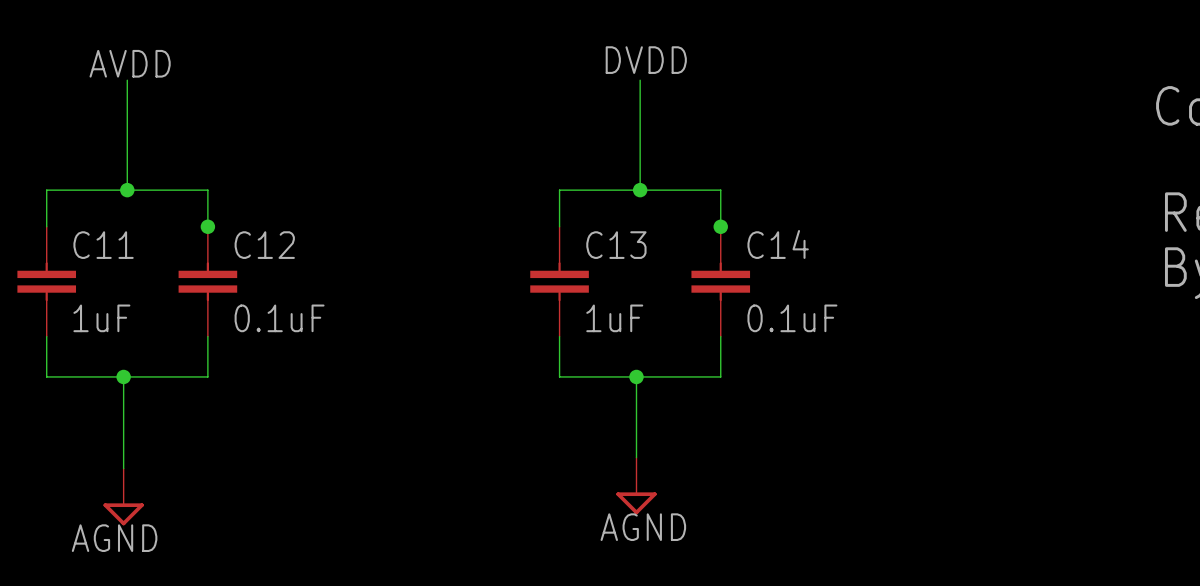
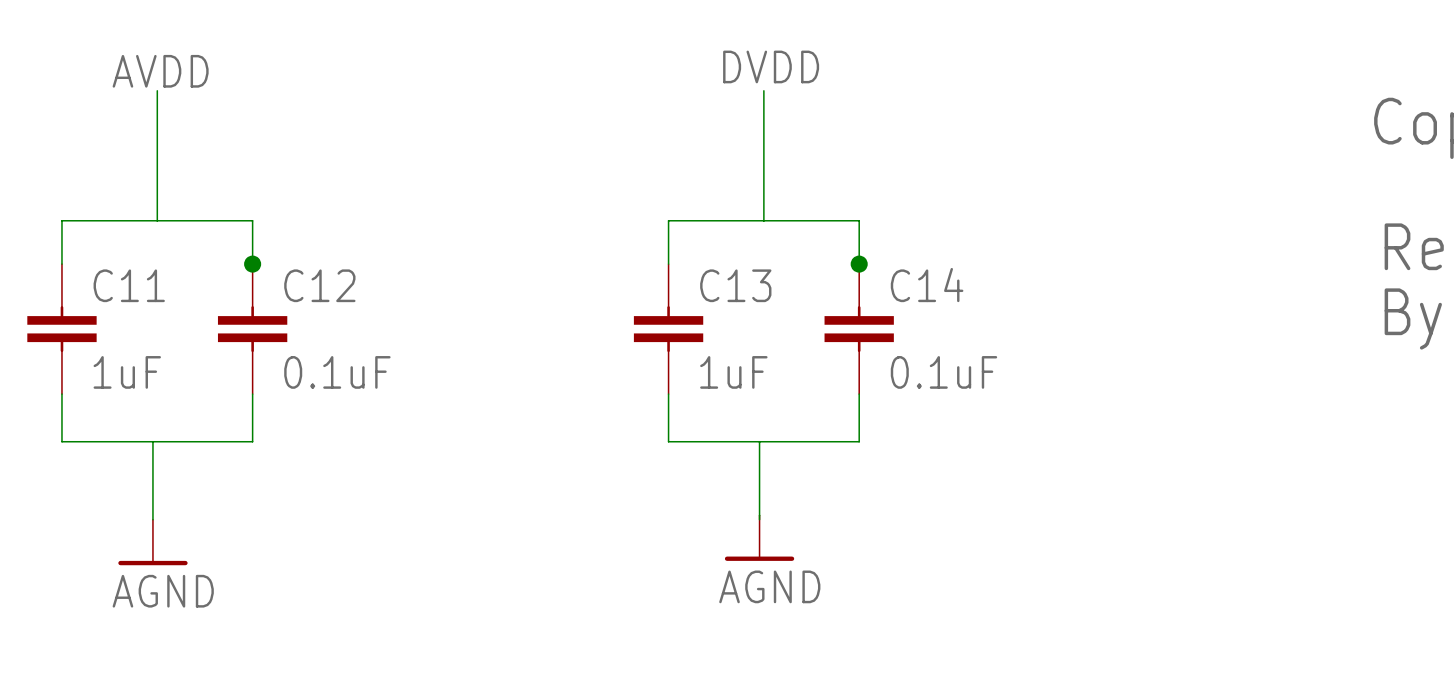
junction: (127, 190) -> none
junction: (640, 190) -> none
junction: (123, 376) -> none
junction: (636, 376) -> none
power symbol: none -> AGND (759, 538)
power symbol: none -> AGND (152, 542)
power symbol: AGND (636, 485) -> none
power symbol: AGND (123, 496) -> none

